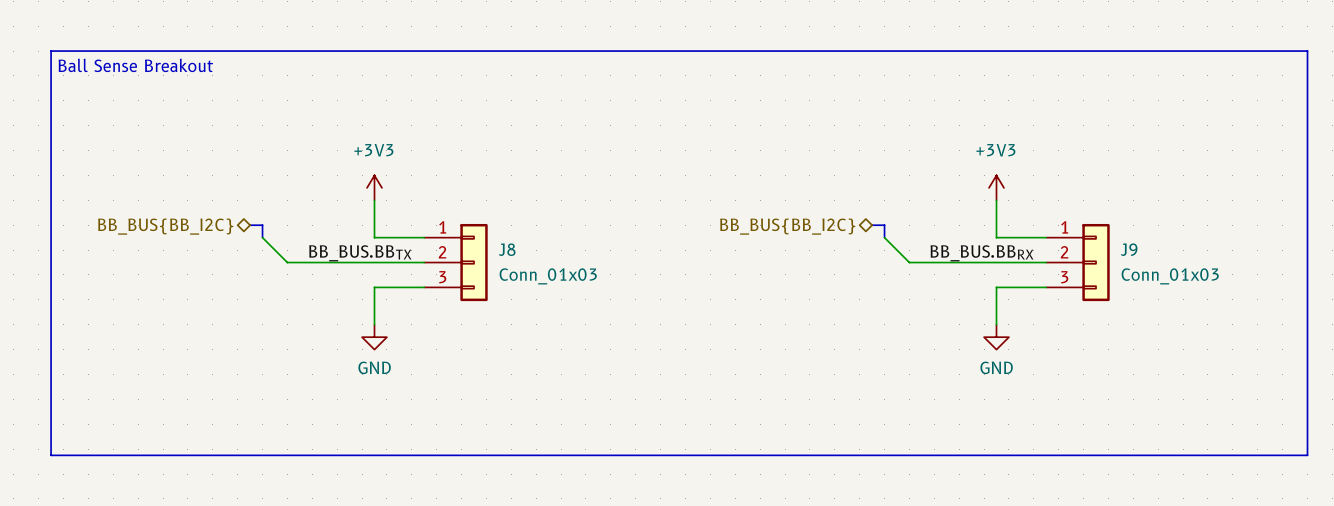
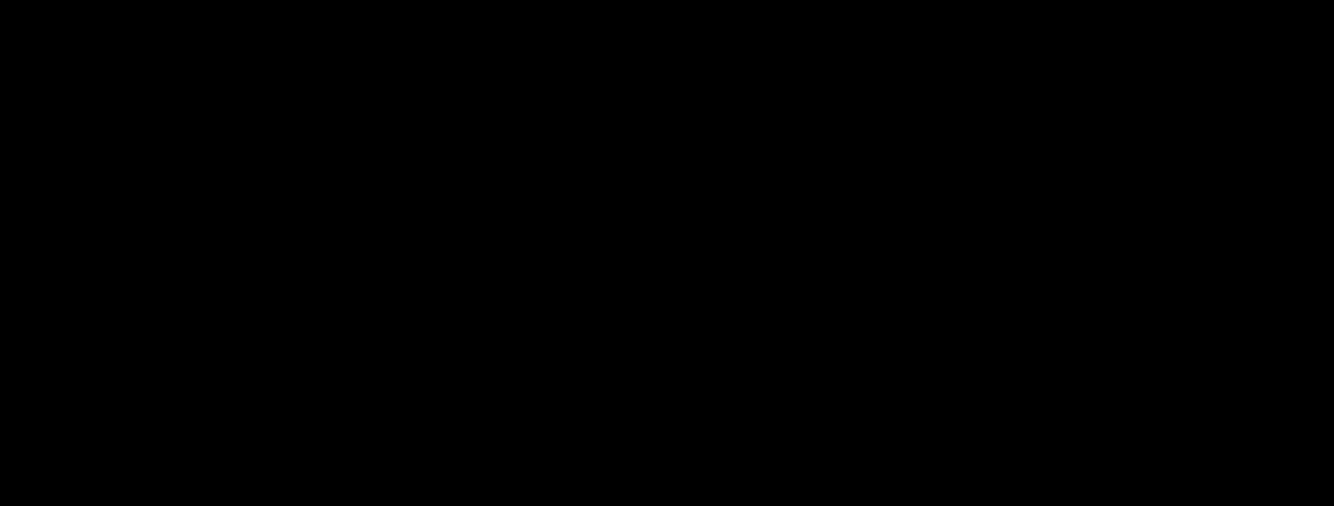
line: (51, 51) (1307, 51) (1307, 455) (51, 455) (51, 51) -> none
text: Ball Sense Breakout (135, 65) -> none
power symbol: +3V3 (374, 187) -> none
power symbol: +3V3 (996, 187) -> none
wire: (374, 200) (374, 237) (424, 237) -> none
wire: (996, 200) (996, 237) (1046, 237) -> none
bus: (250, 225) (262, 225) (262, 237) -> none
bus: (872, 225) (884, 225) (884, 237) -> none
hierarchical label: BB_BUS{BB_I2C} (165, 226) -> none
hierarchical label: BB_BUS{BB_I2C} (787, 226) -> none
wire: (262, 237) (287, 262) (424, 262) -> none
wire: (884, 237) (909, 262) (1046, 262) -> none
label: BB_BUS.BBTX (360, 253) -> none
label: BB_BUS.BBRX (981, 253) -> none
J8: Conn_01x03 (455, 262) -> none
J9: Conn_01x03 (1077, 262) -> none
wire: (424, 287) (374, 287) (374, 324) -> none
wire: (1046, 287) (996, 287) (996, 324) -> none
power symbol: GND (374, 337) -> none
power symbol: GND (996, 337) -> none

